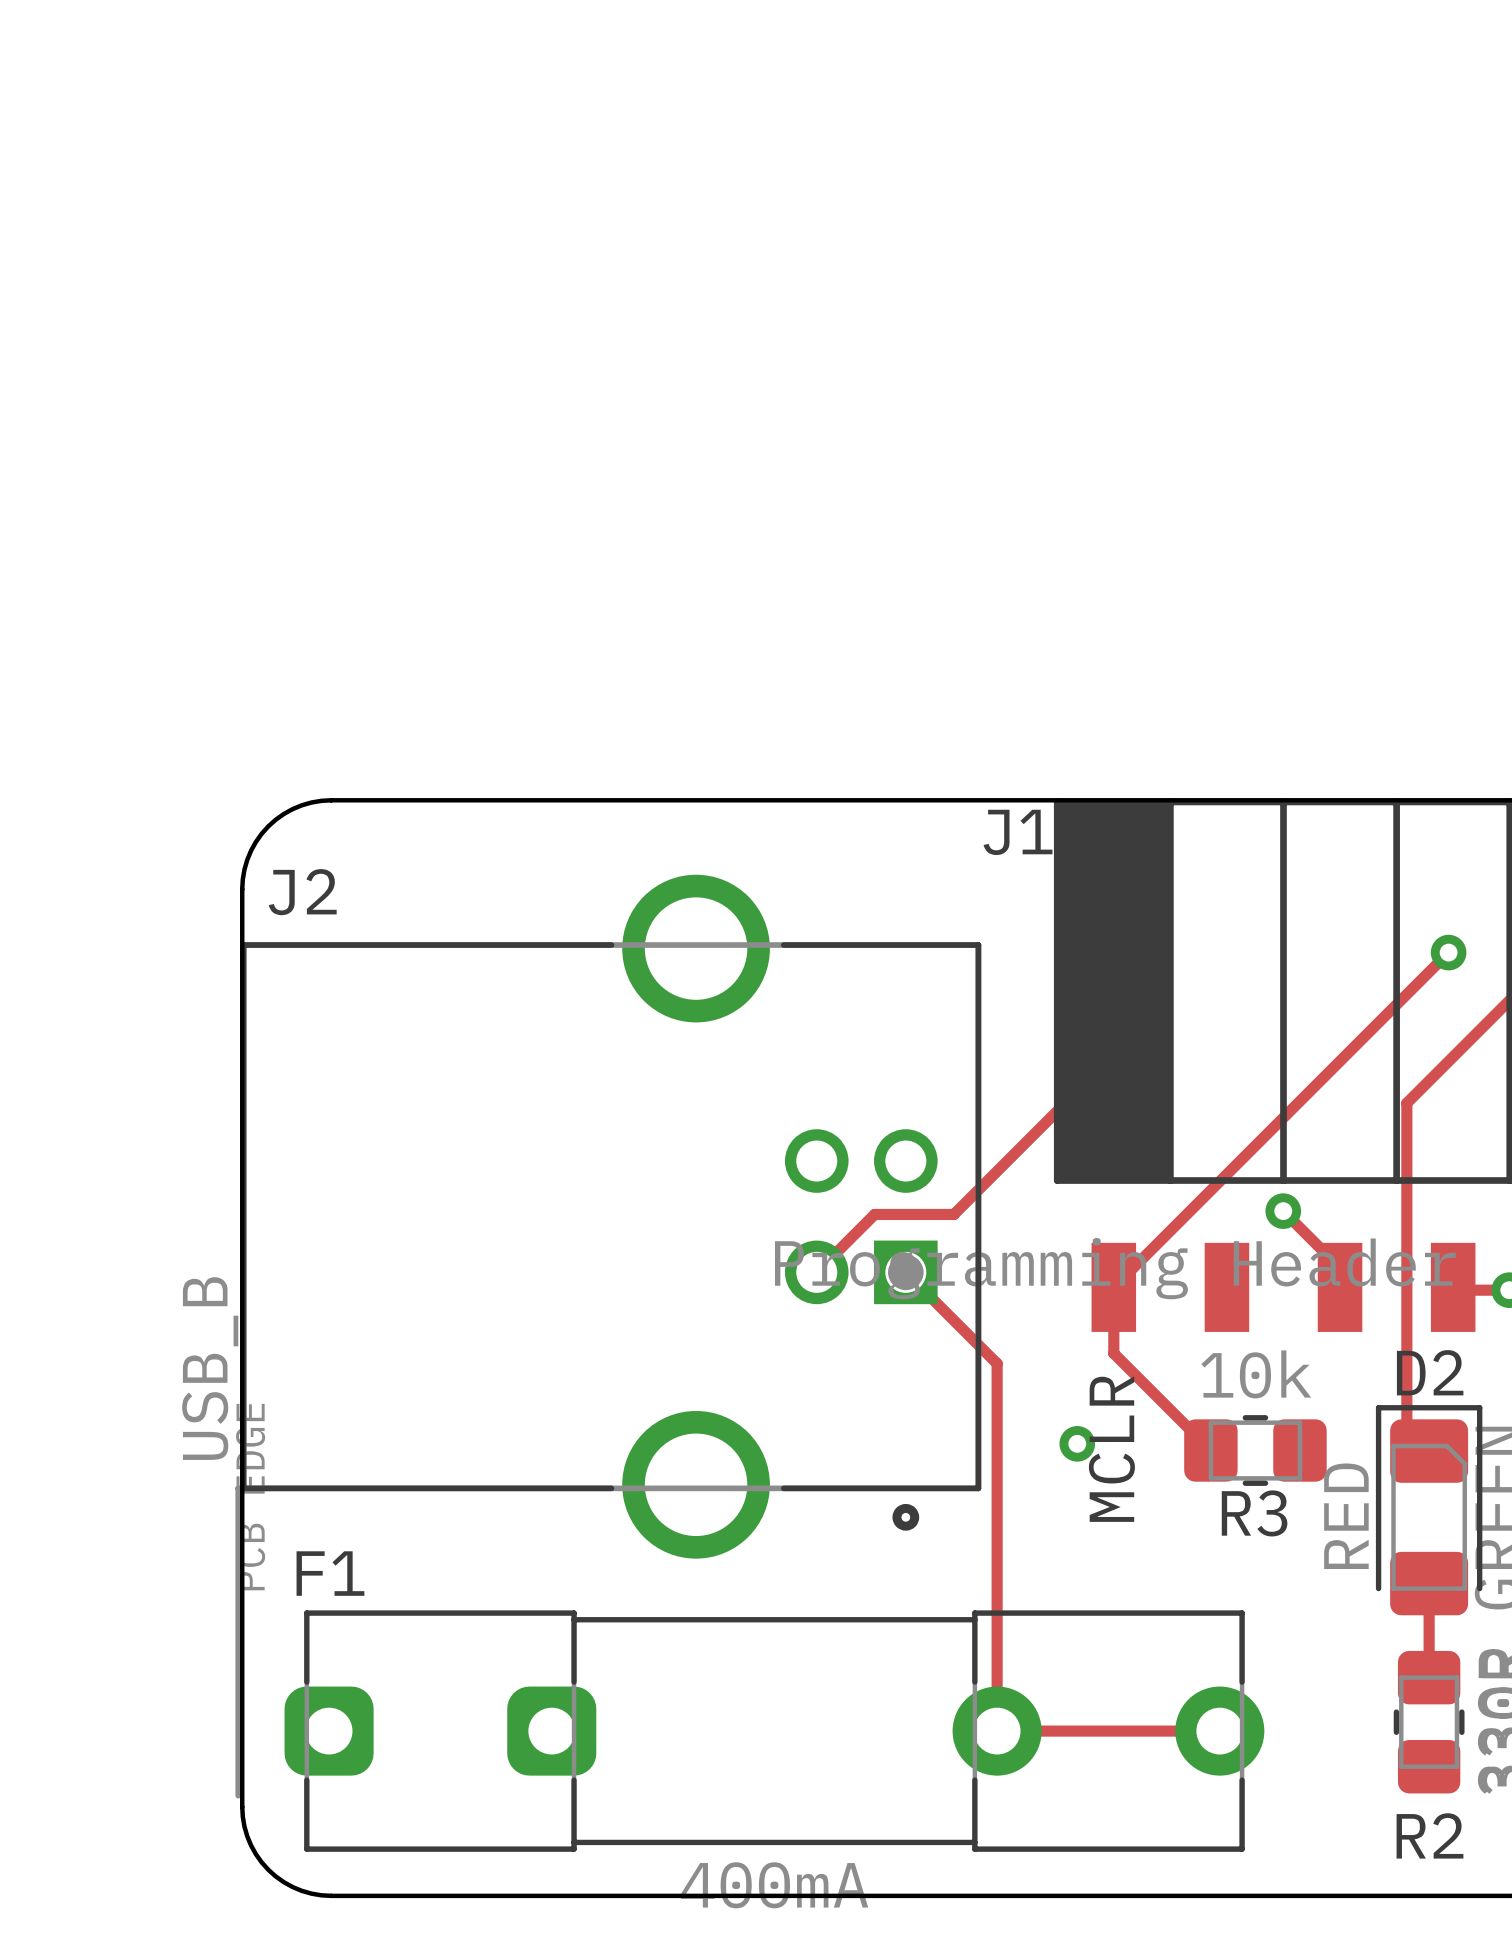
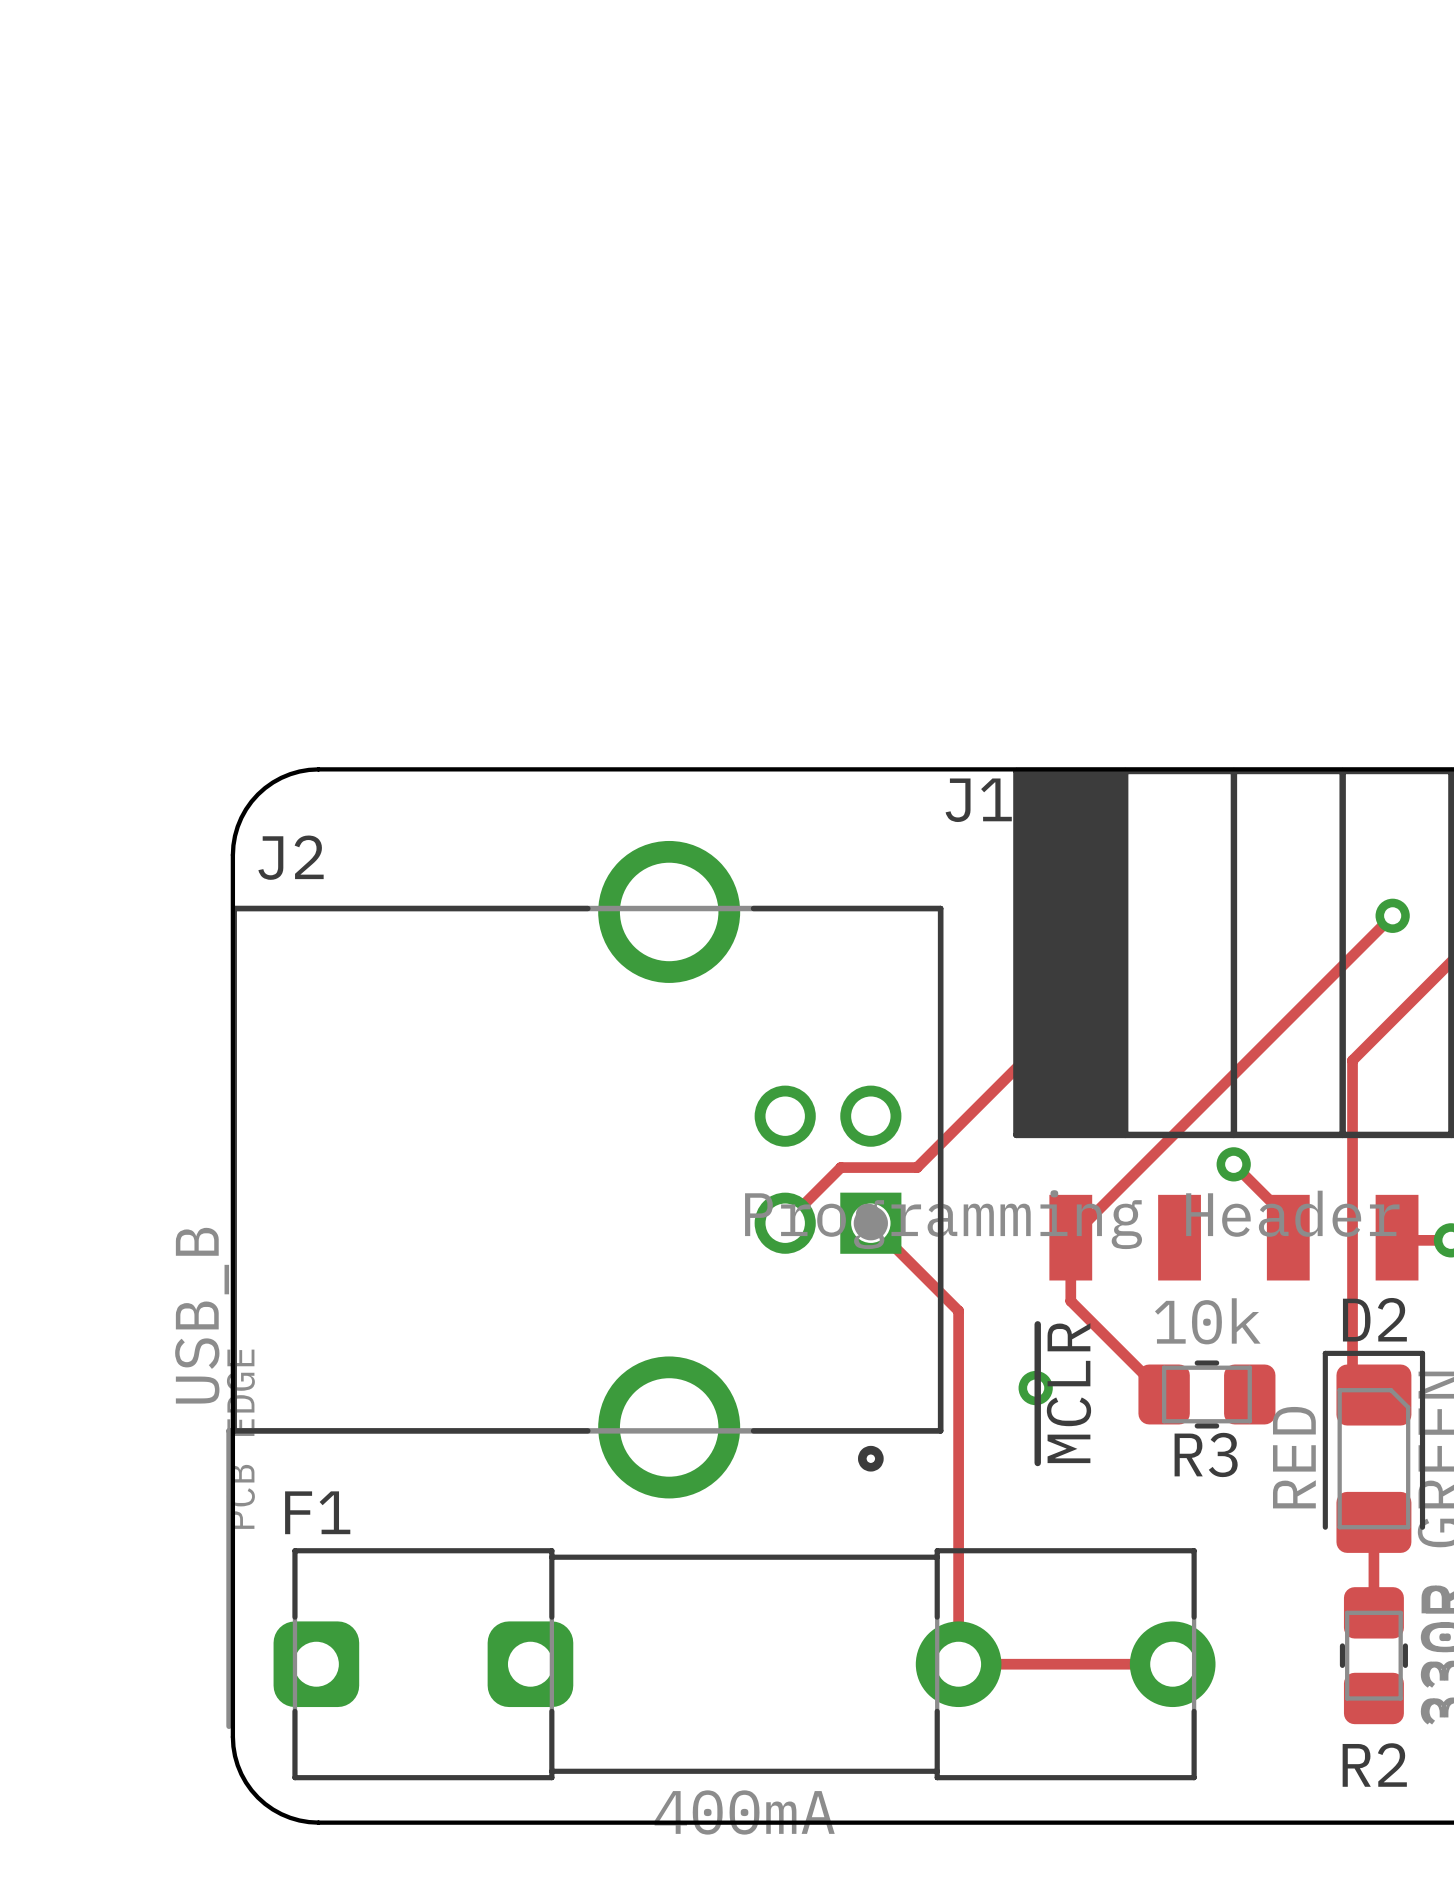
text: MCLR (1111, 1449) -> ~{MCLR} (1064, 1393)

